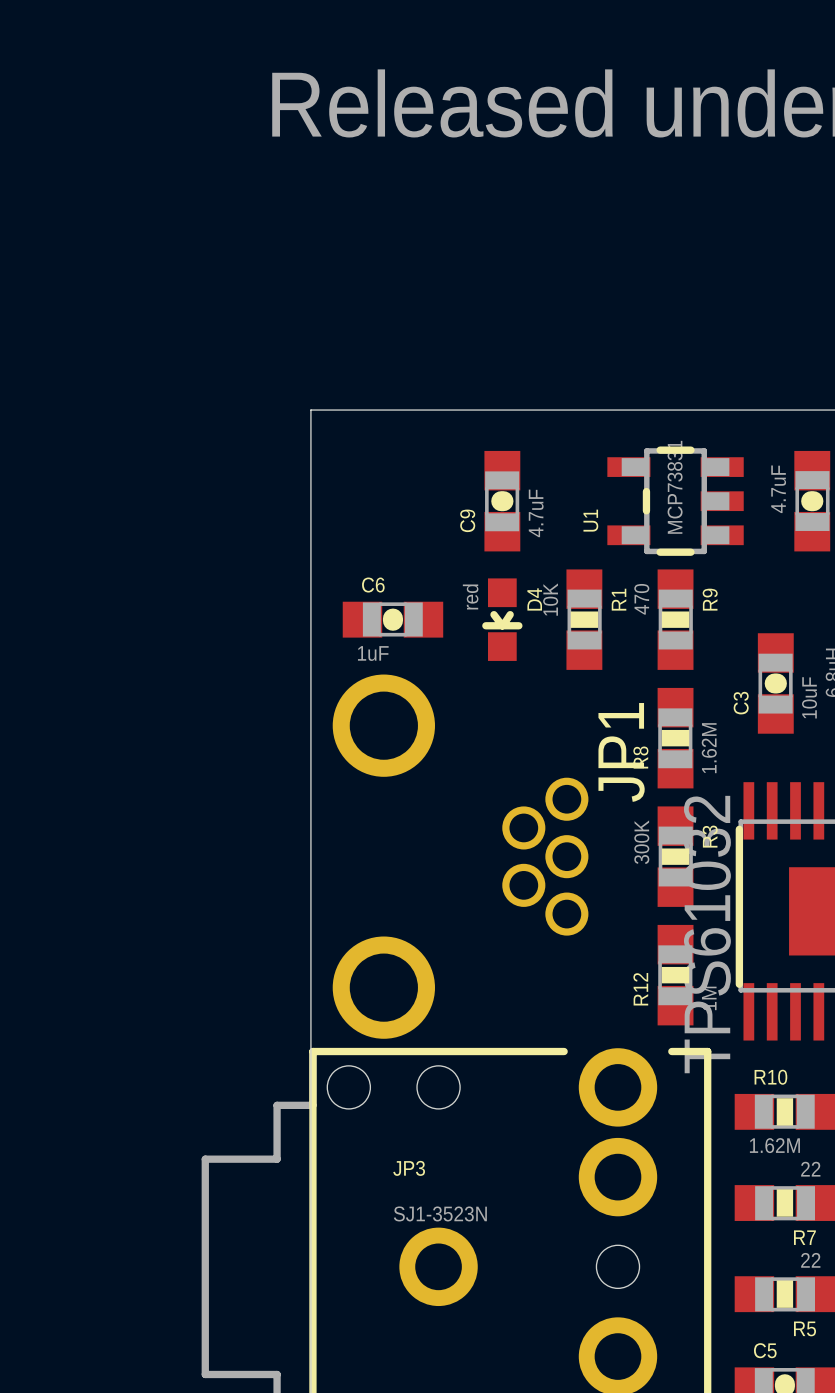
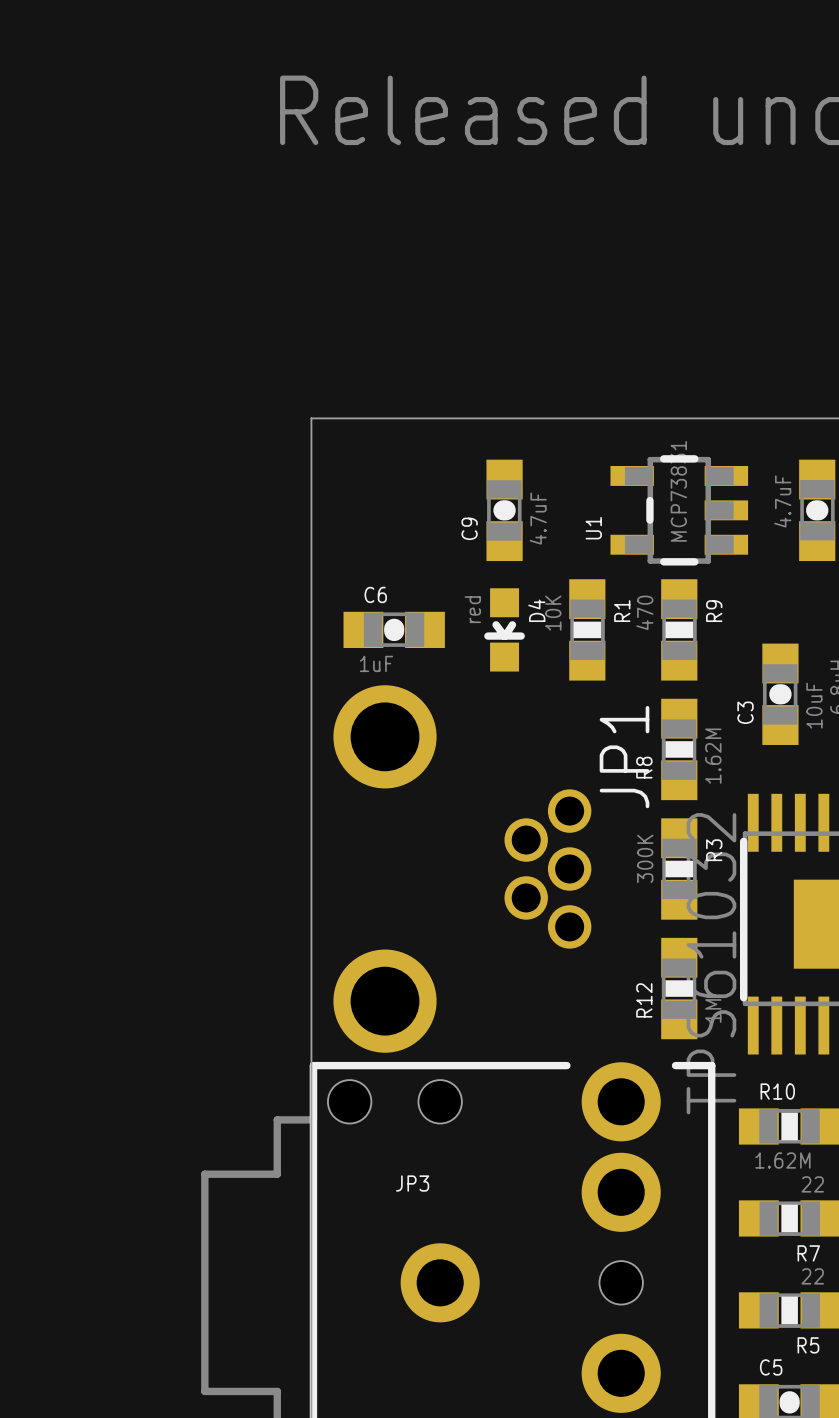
JP3 value: SJ1-3523N (440, 1213) -> none

